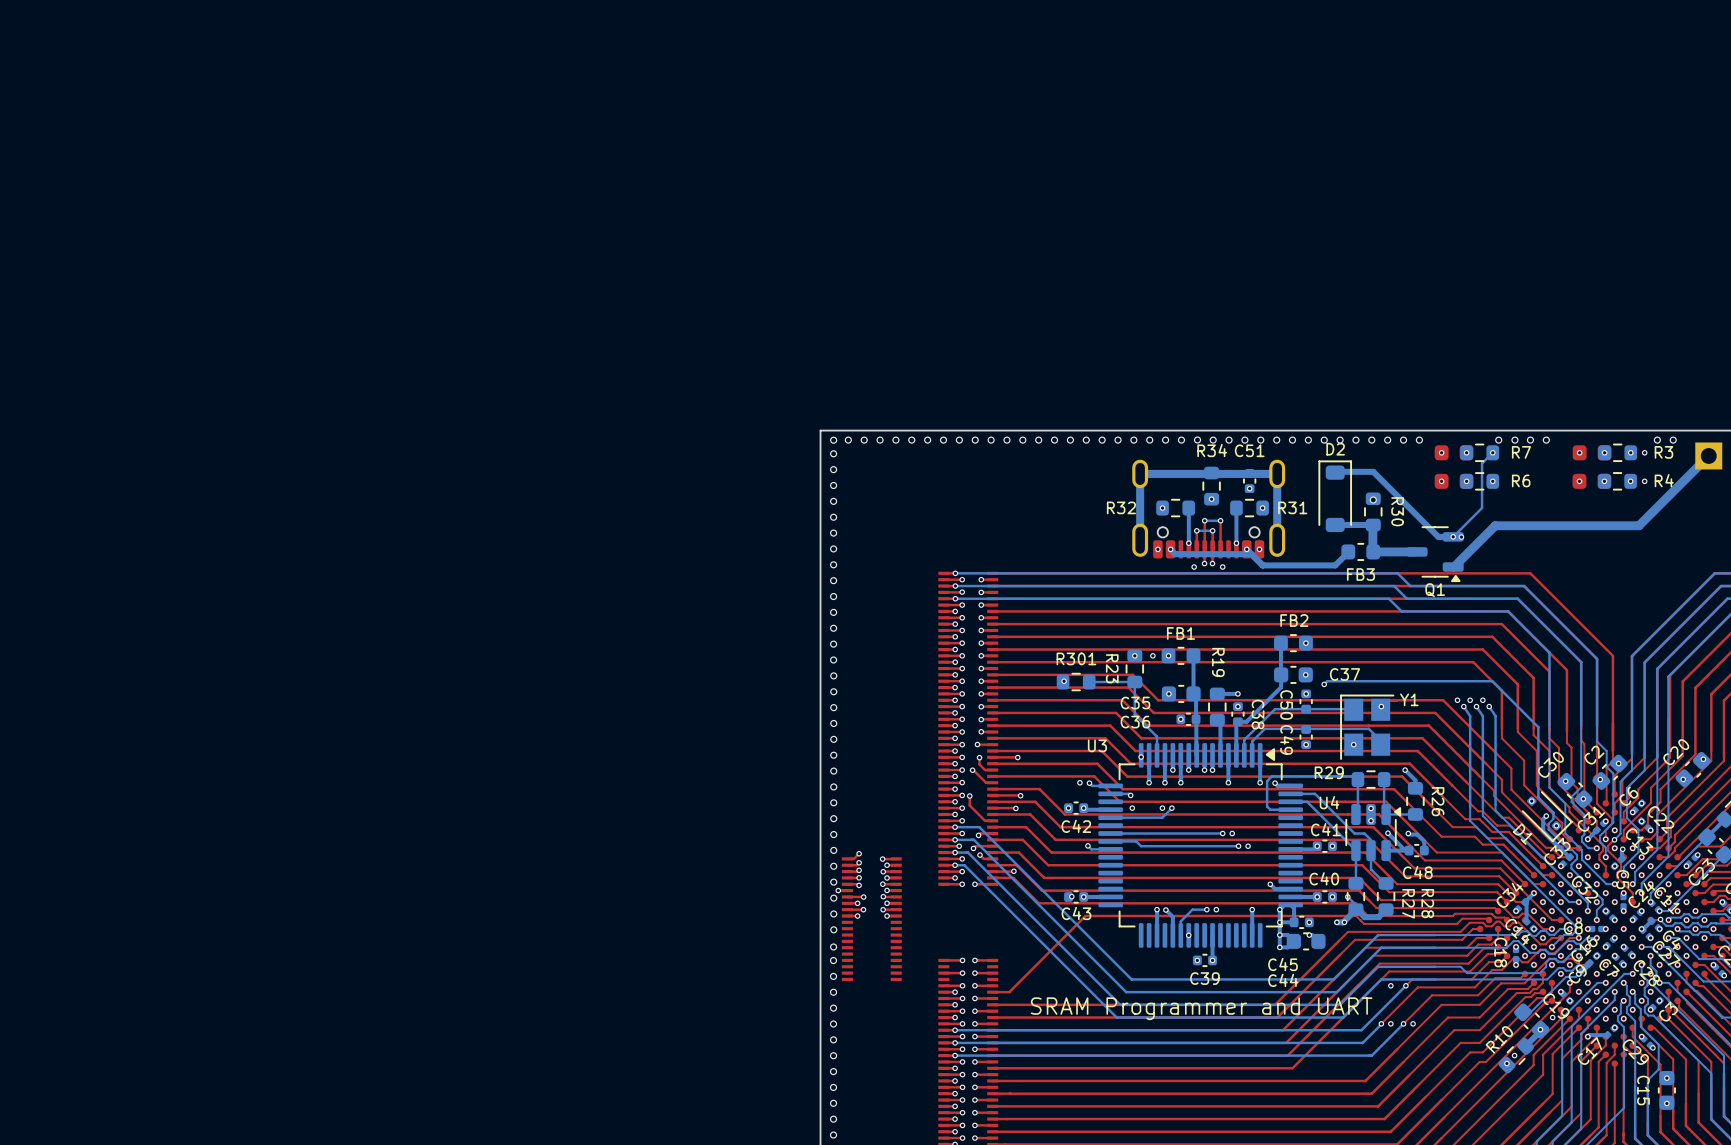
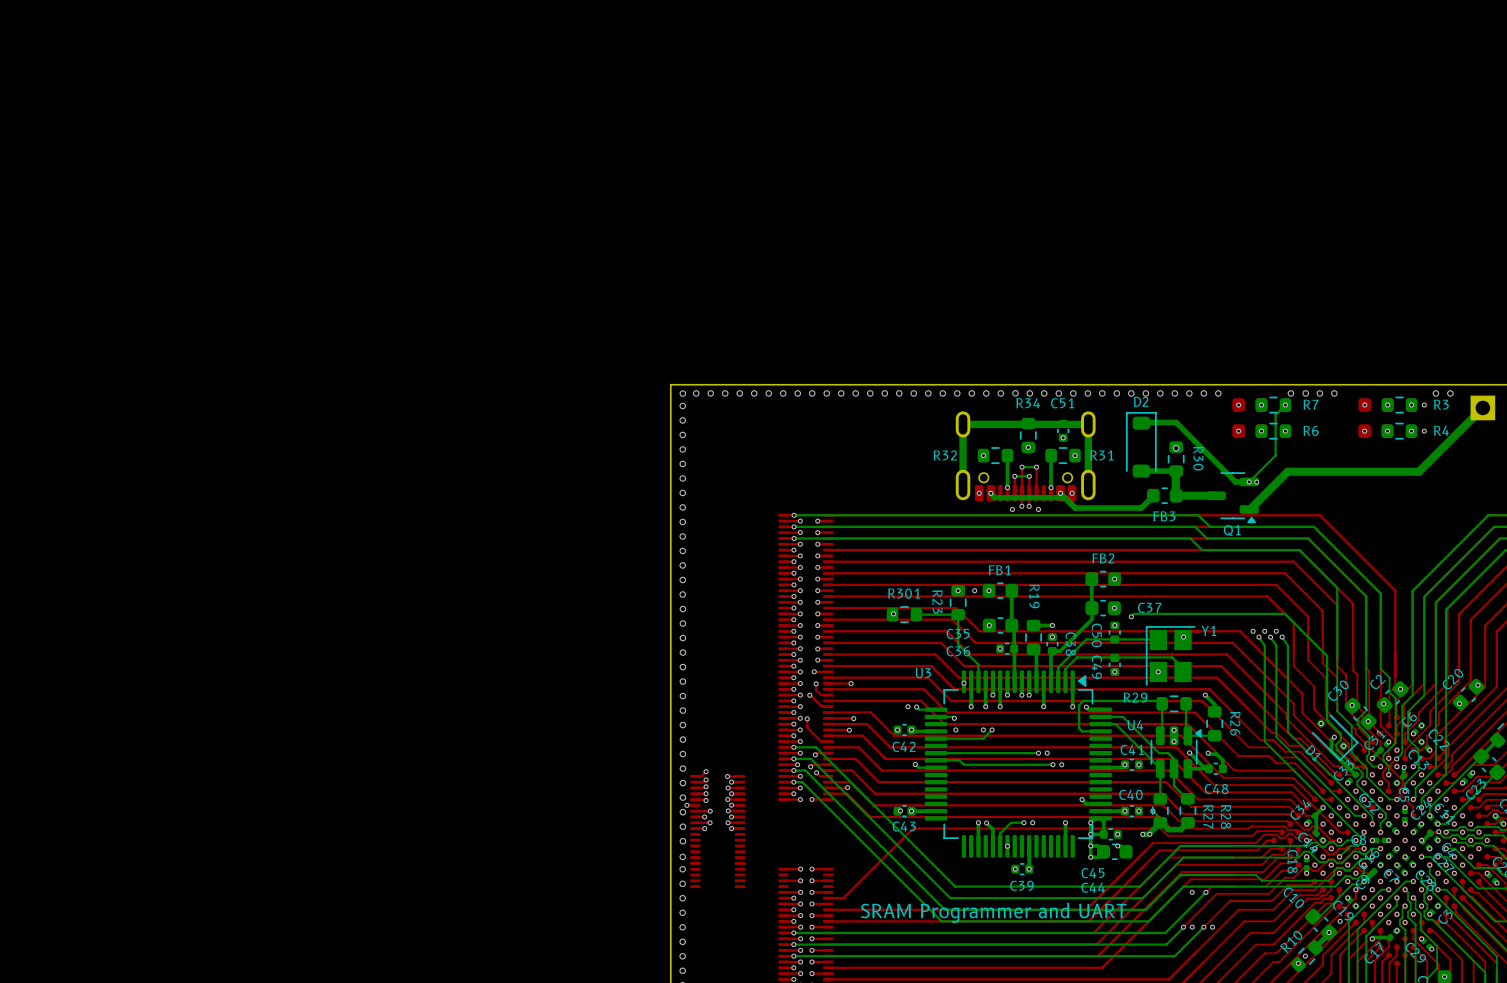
C10 name: none -> C10 (1293, 897)

